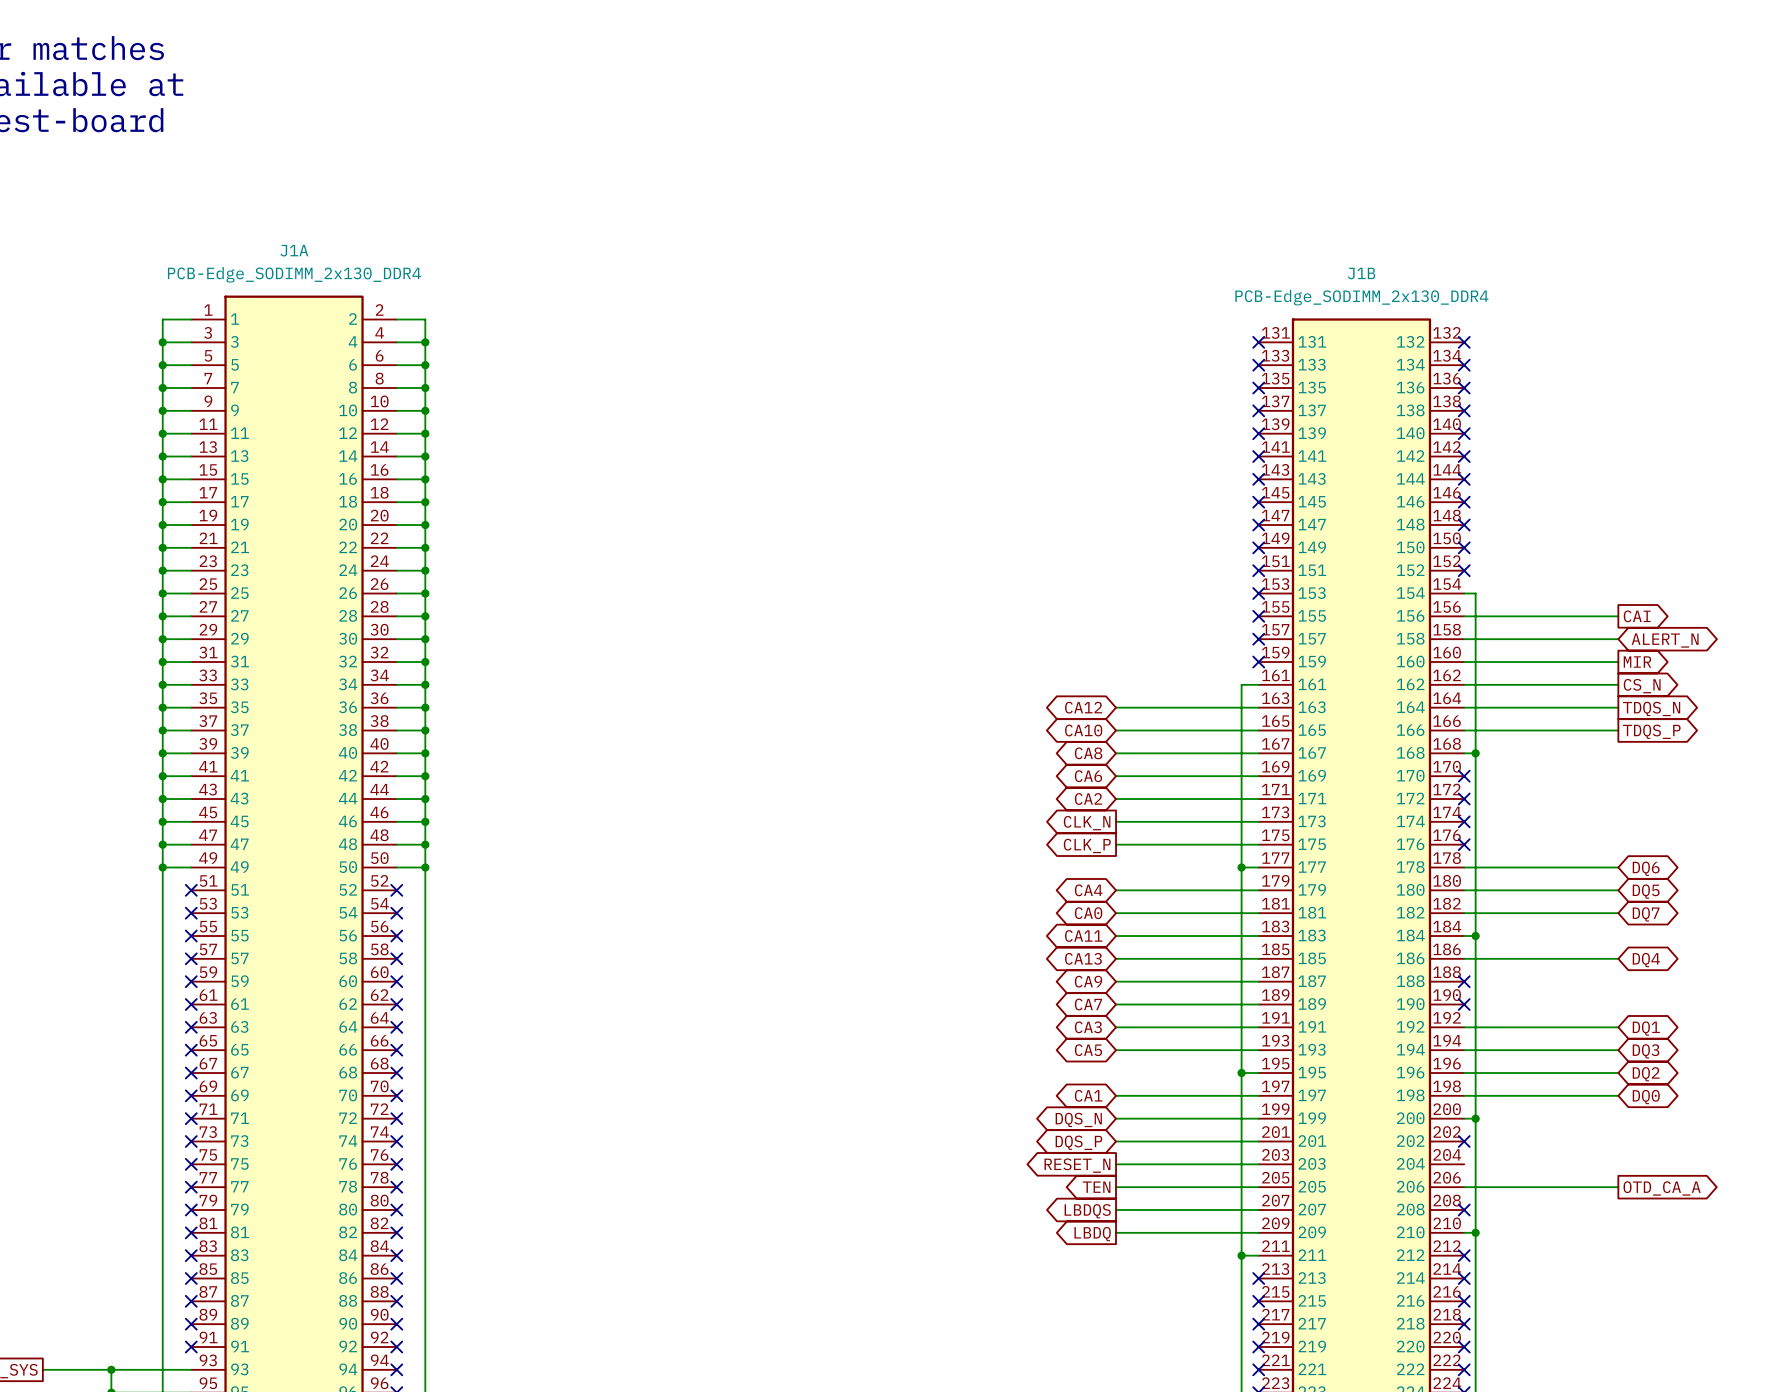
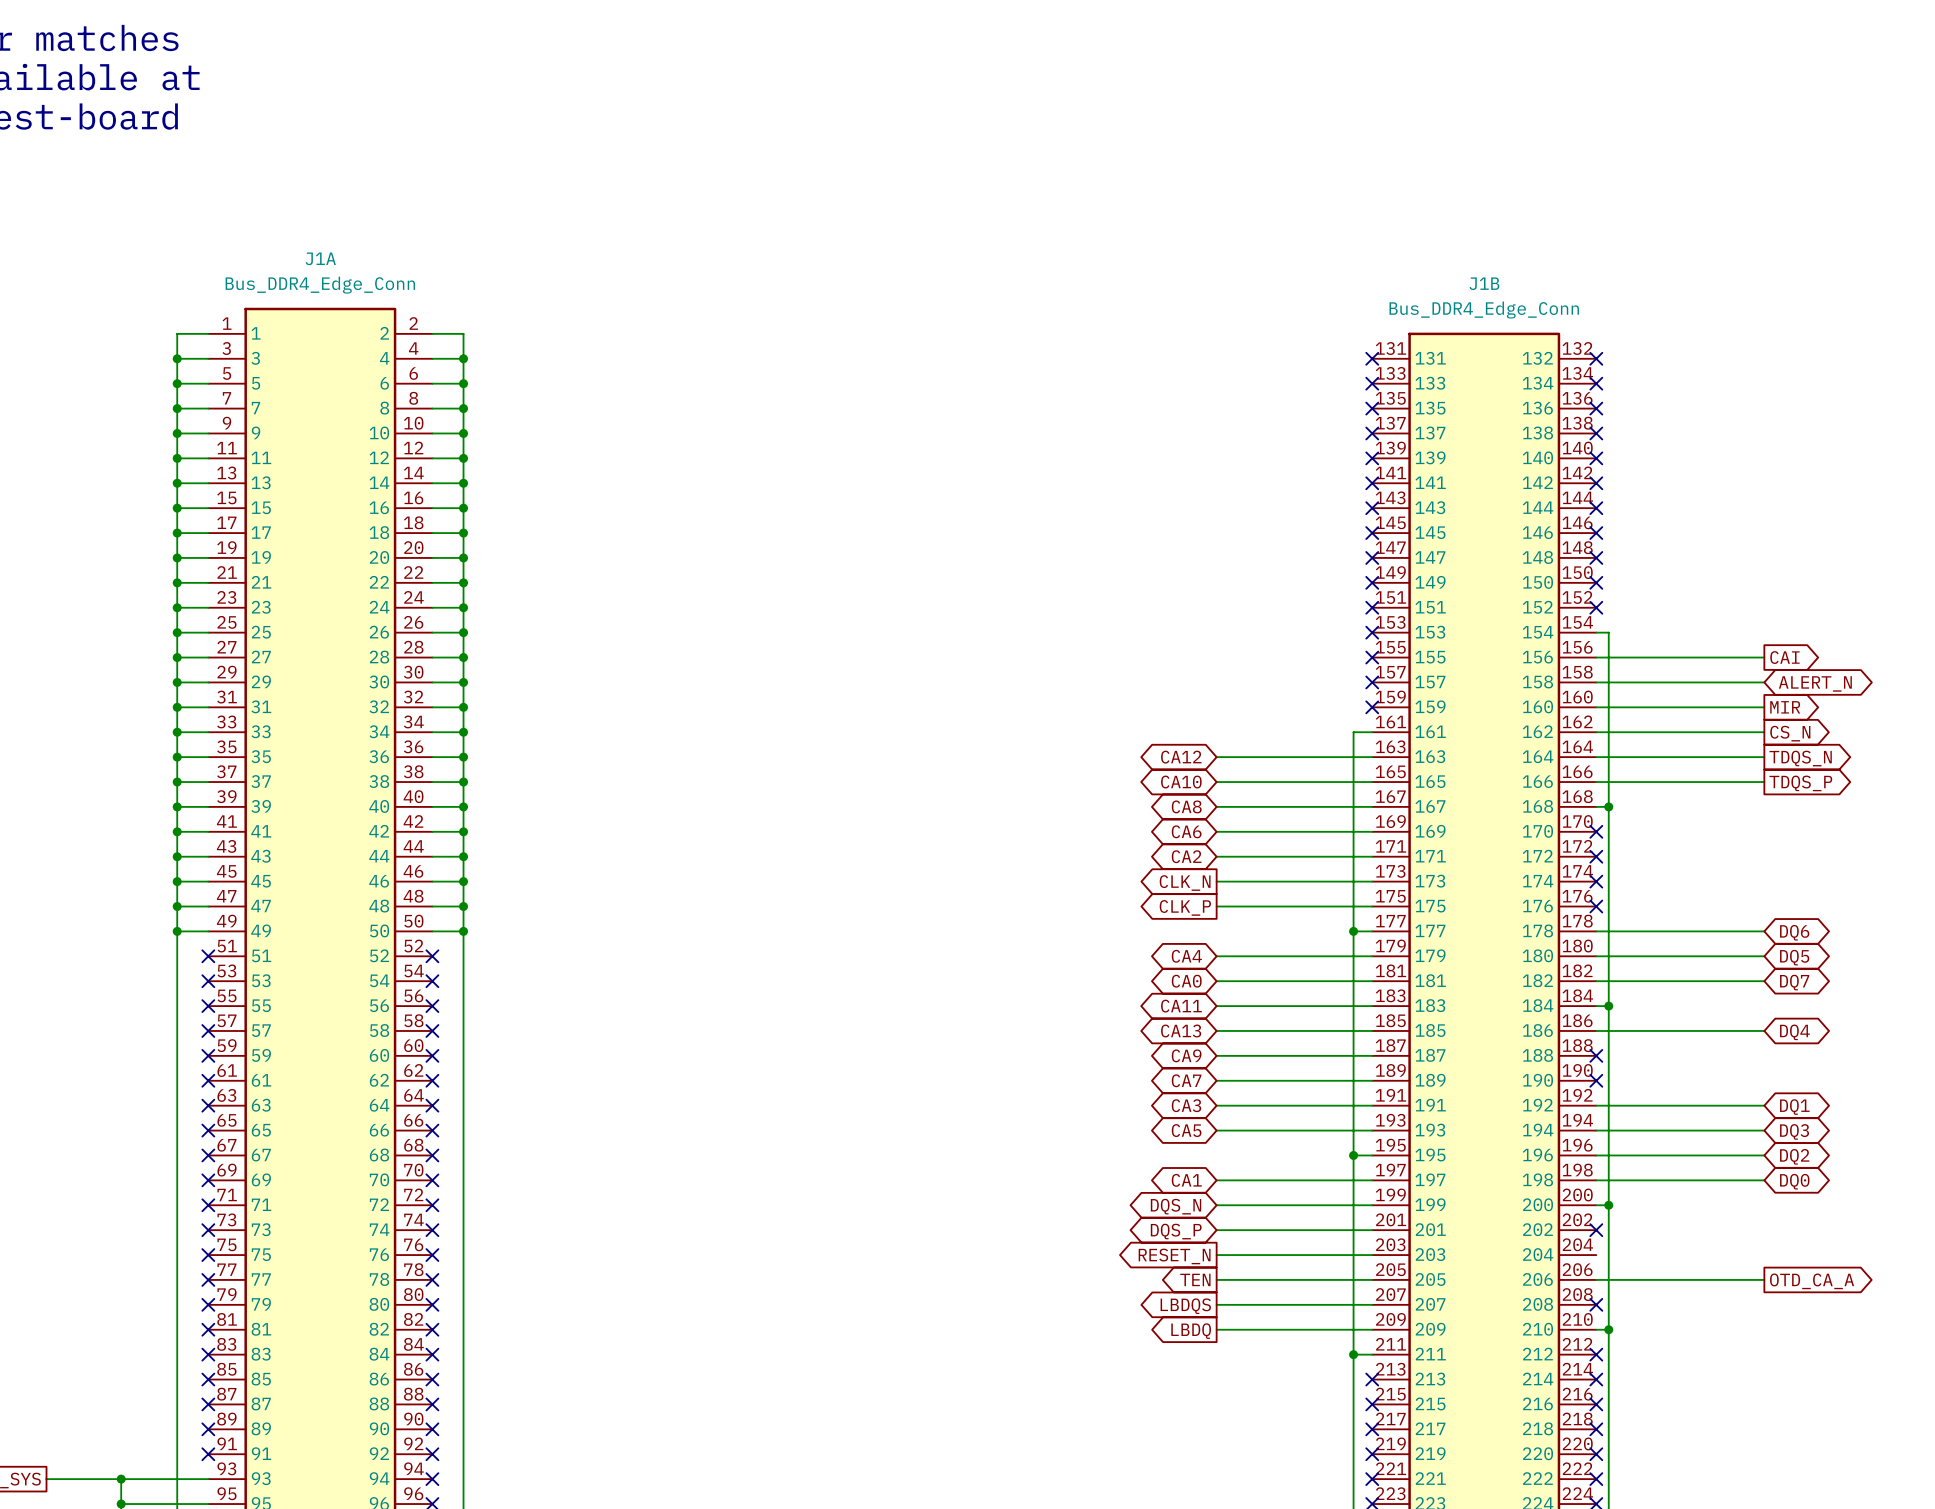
J1A value: PCB-Edge_SODIMM_2x130_DDR4 (294, 274) -> Bus_DDR4_Edge_Conn (320, 285)
J1B value: PCB-Edge_SODIMM_2x130_DDR4 (1361, 297) -> Bus_DDR4_Edge_Conn (1484, 310)

